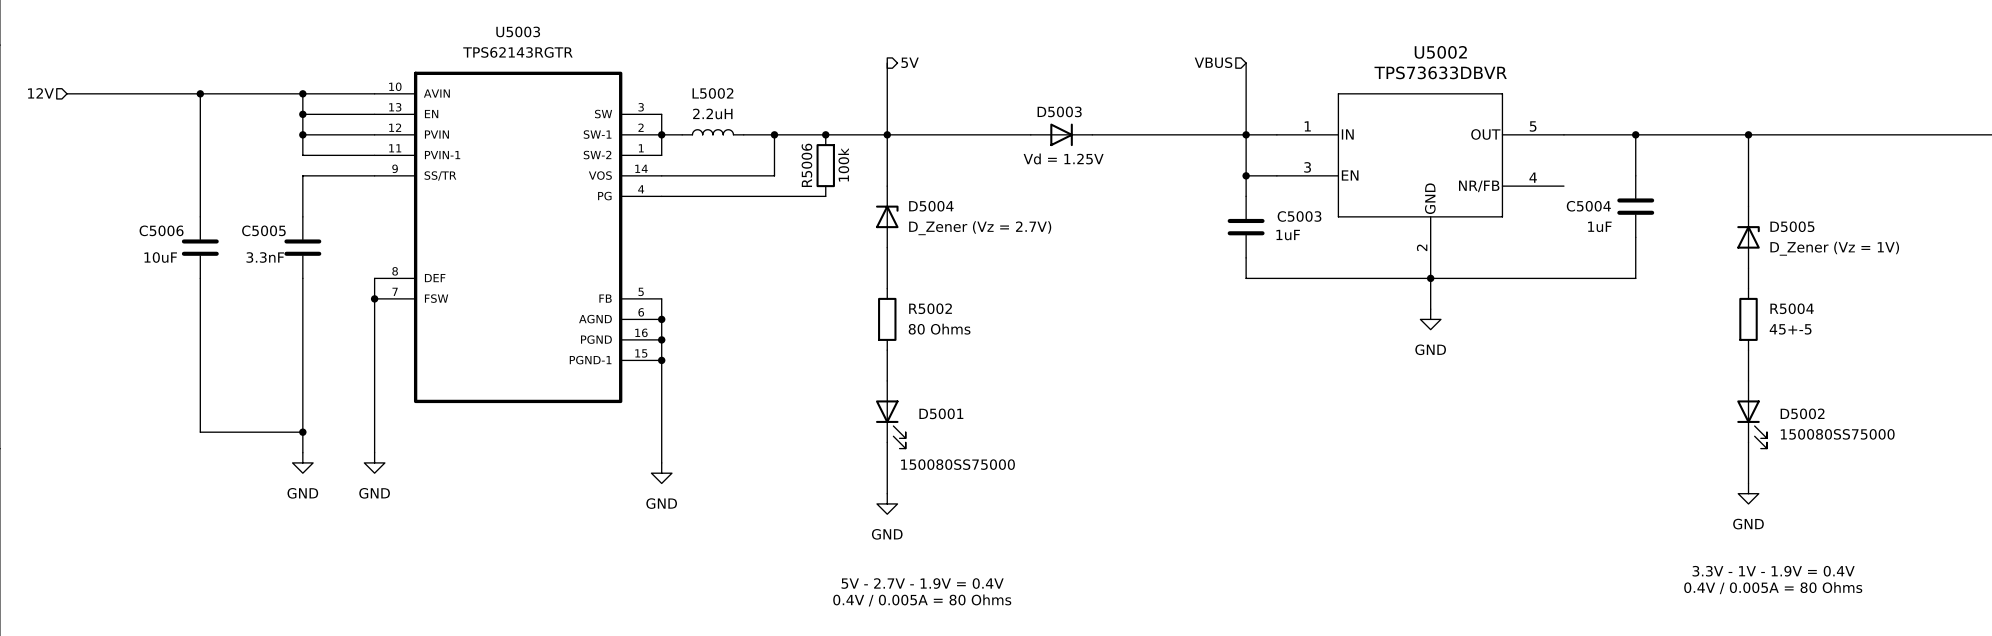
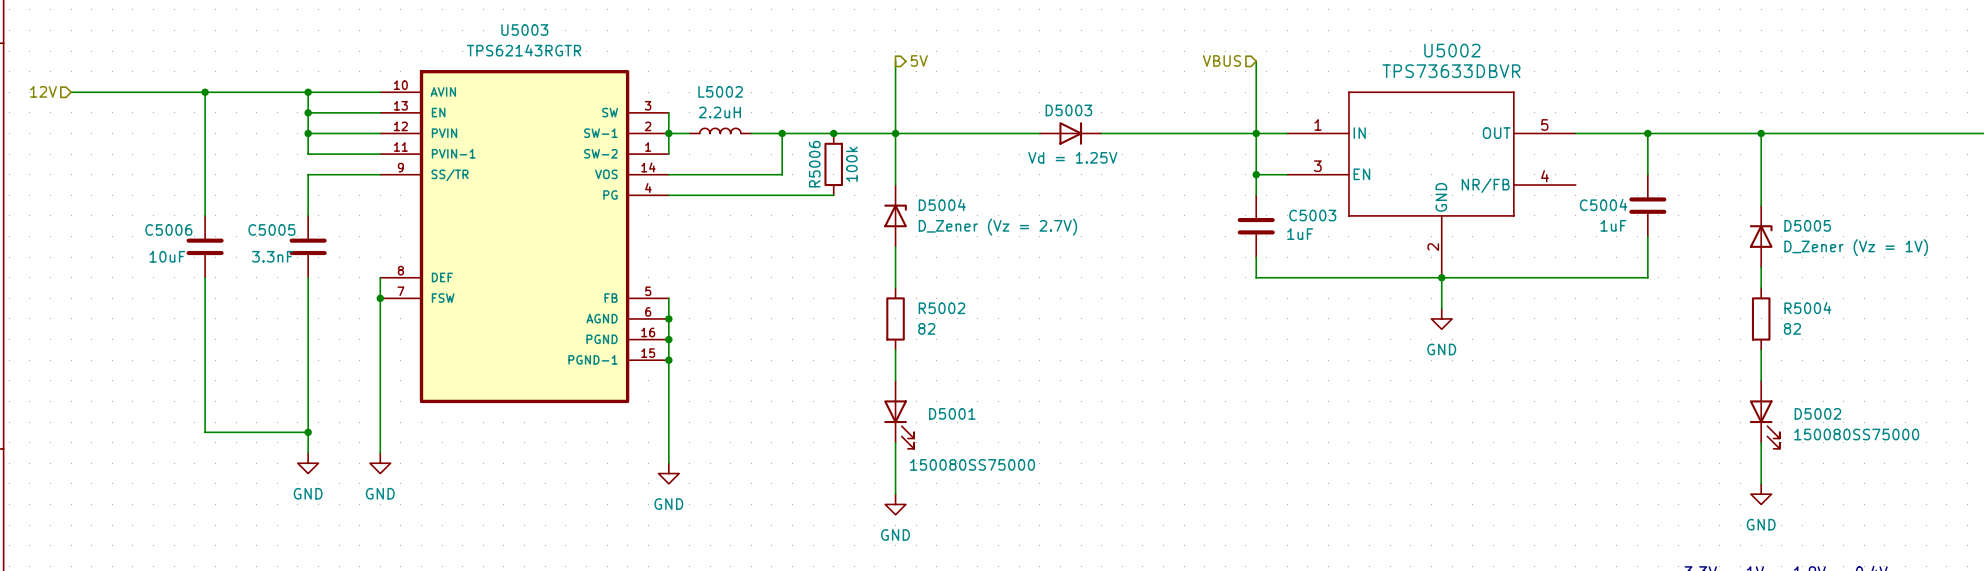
R5002 value: 80 Ohms (939, 329) -> 82 (926, 328)
R5004 value: 45+-5 (1790, 329) -> 82 (1792, 328)

